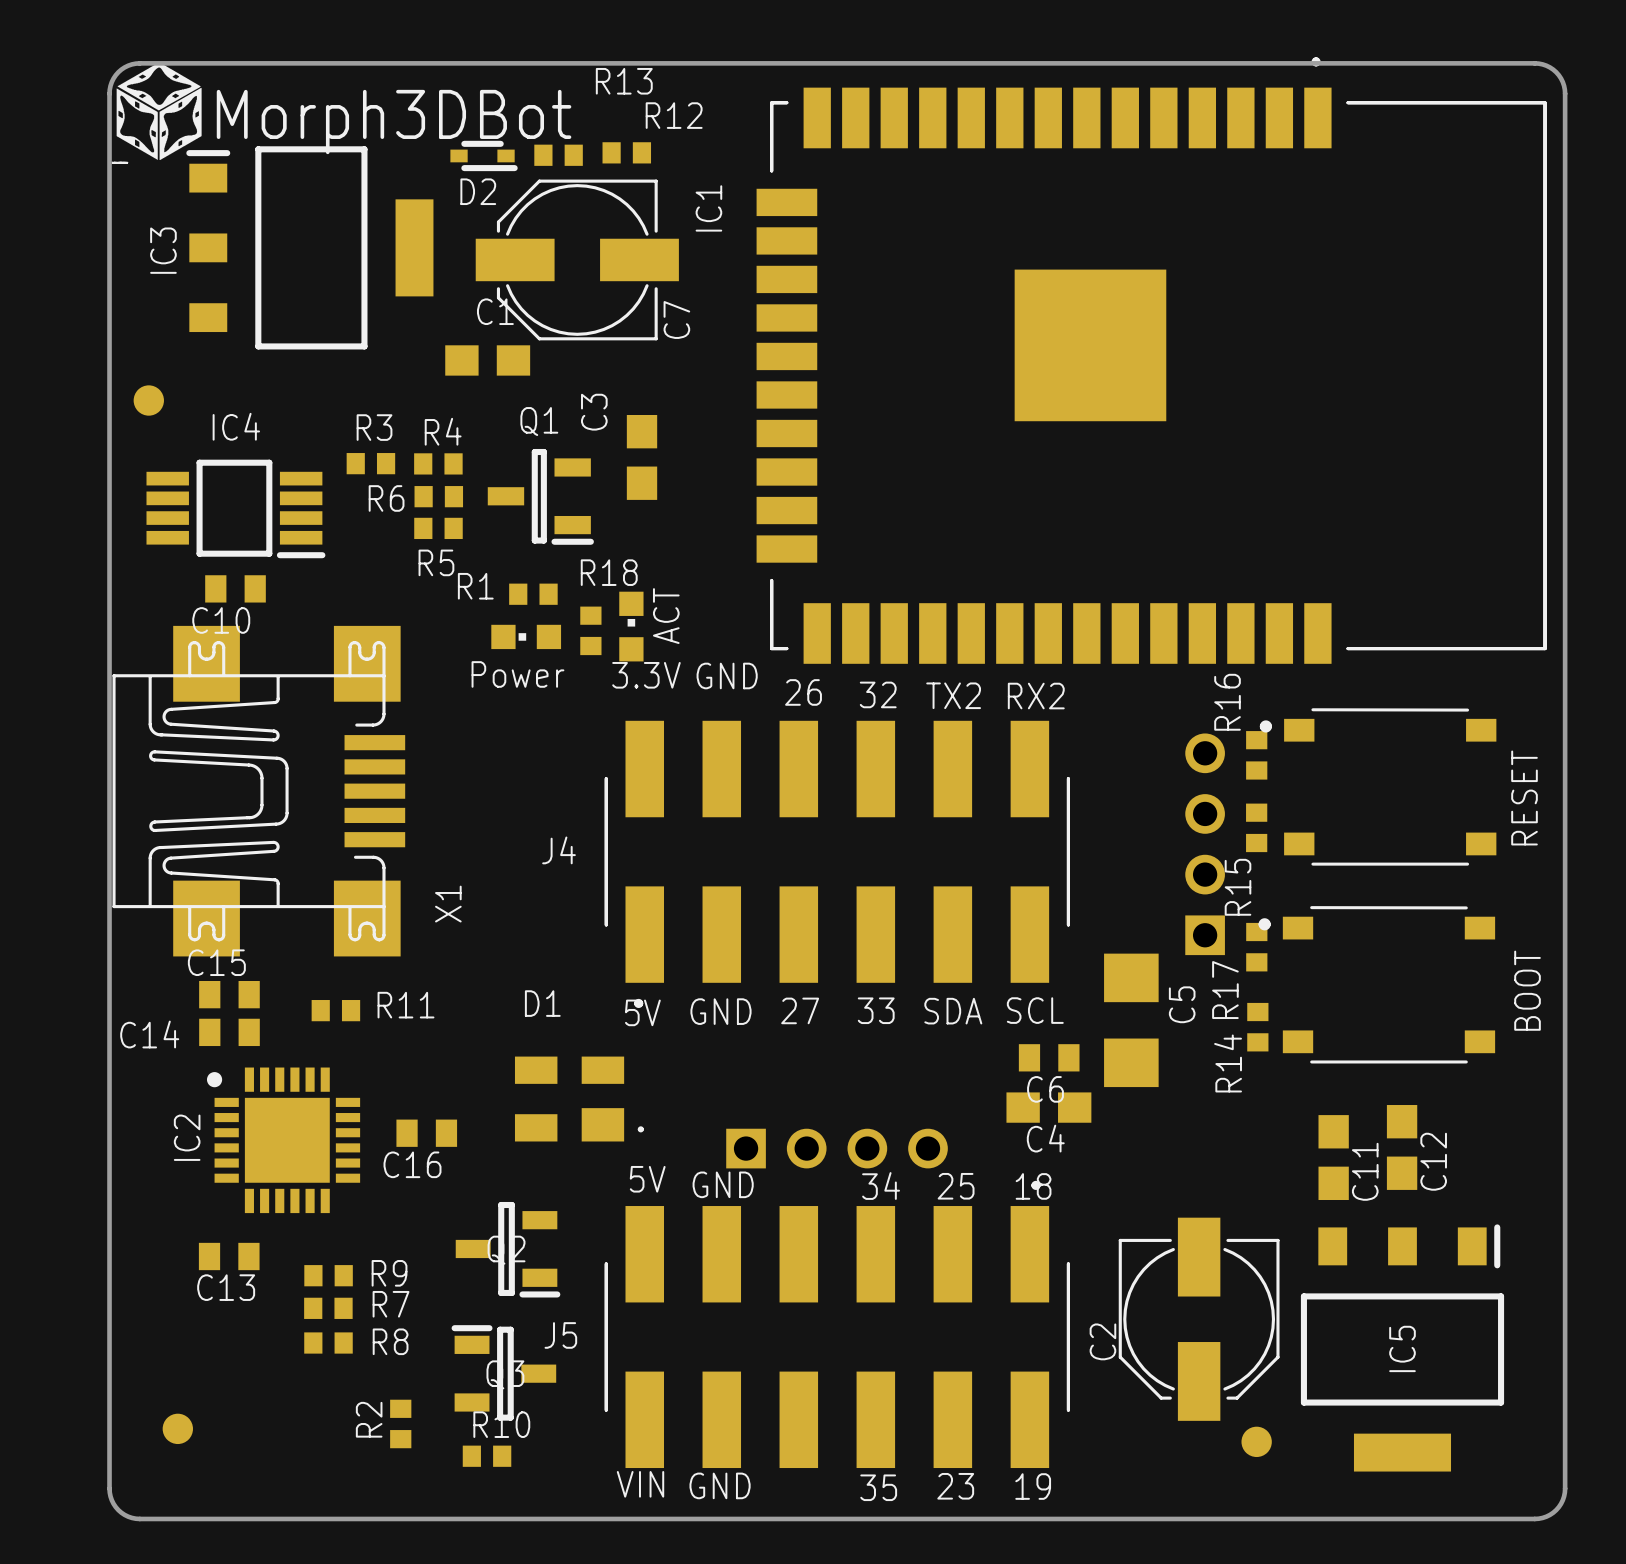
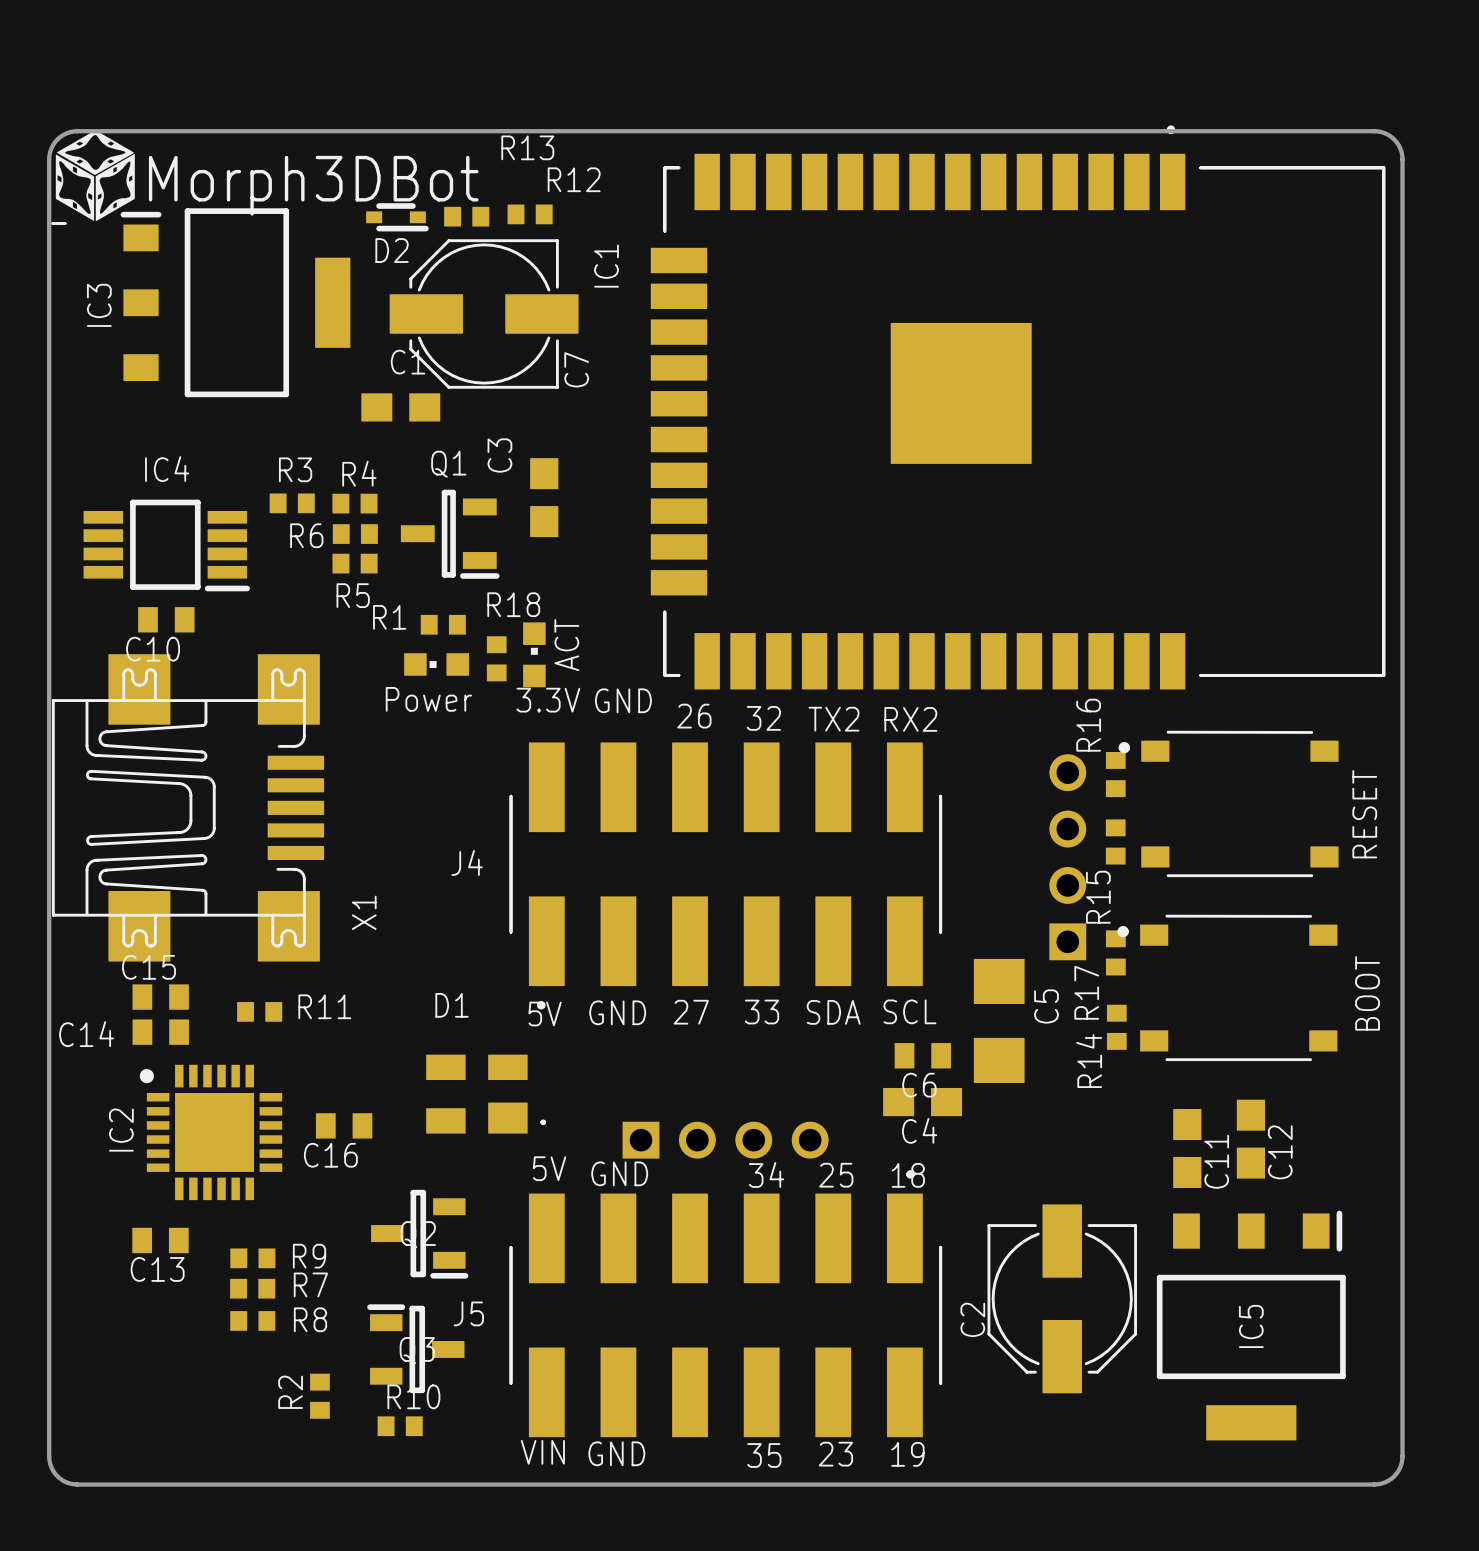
part: (148, 400) -> none
part: (177, 1428) -> none
part: (1256, 1441) -> none

